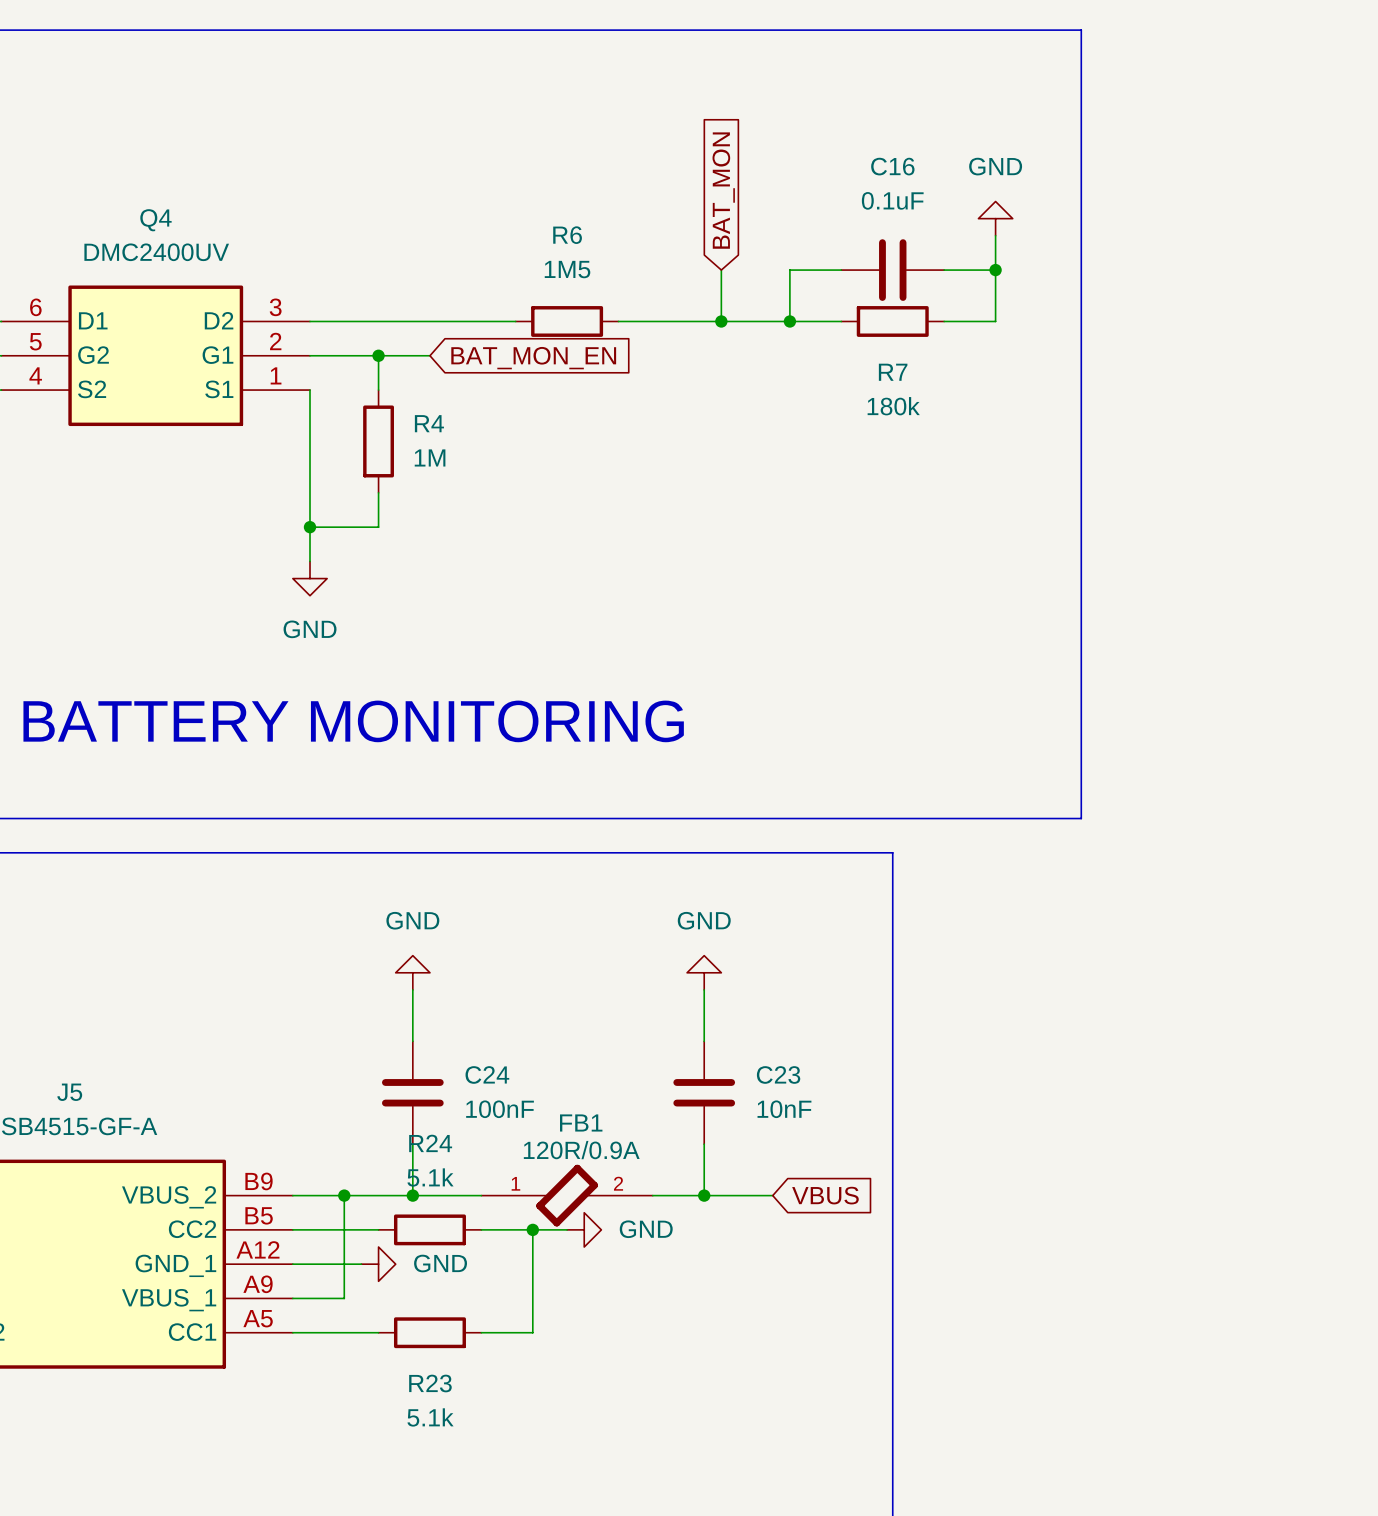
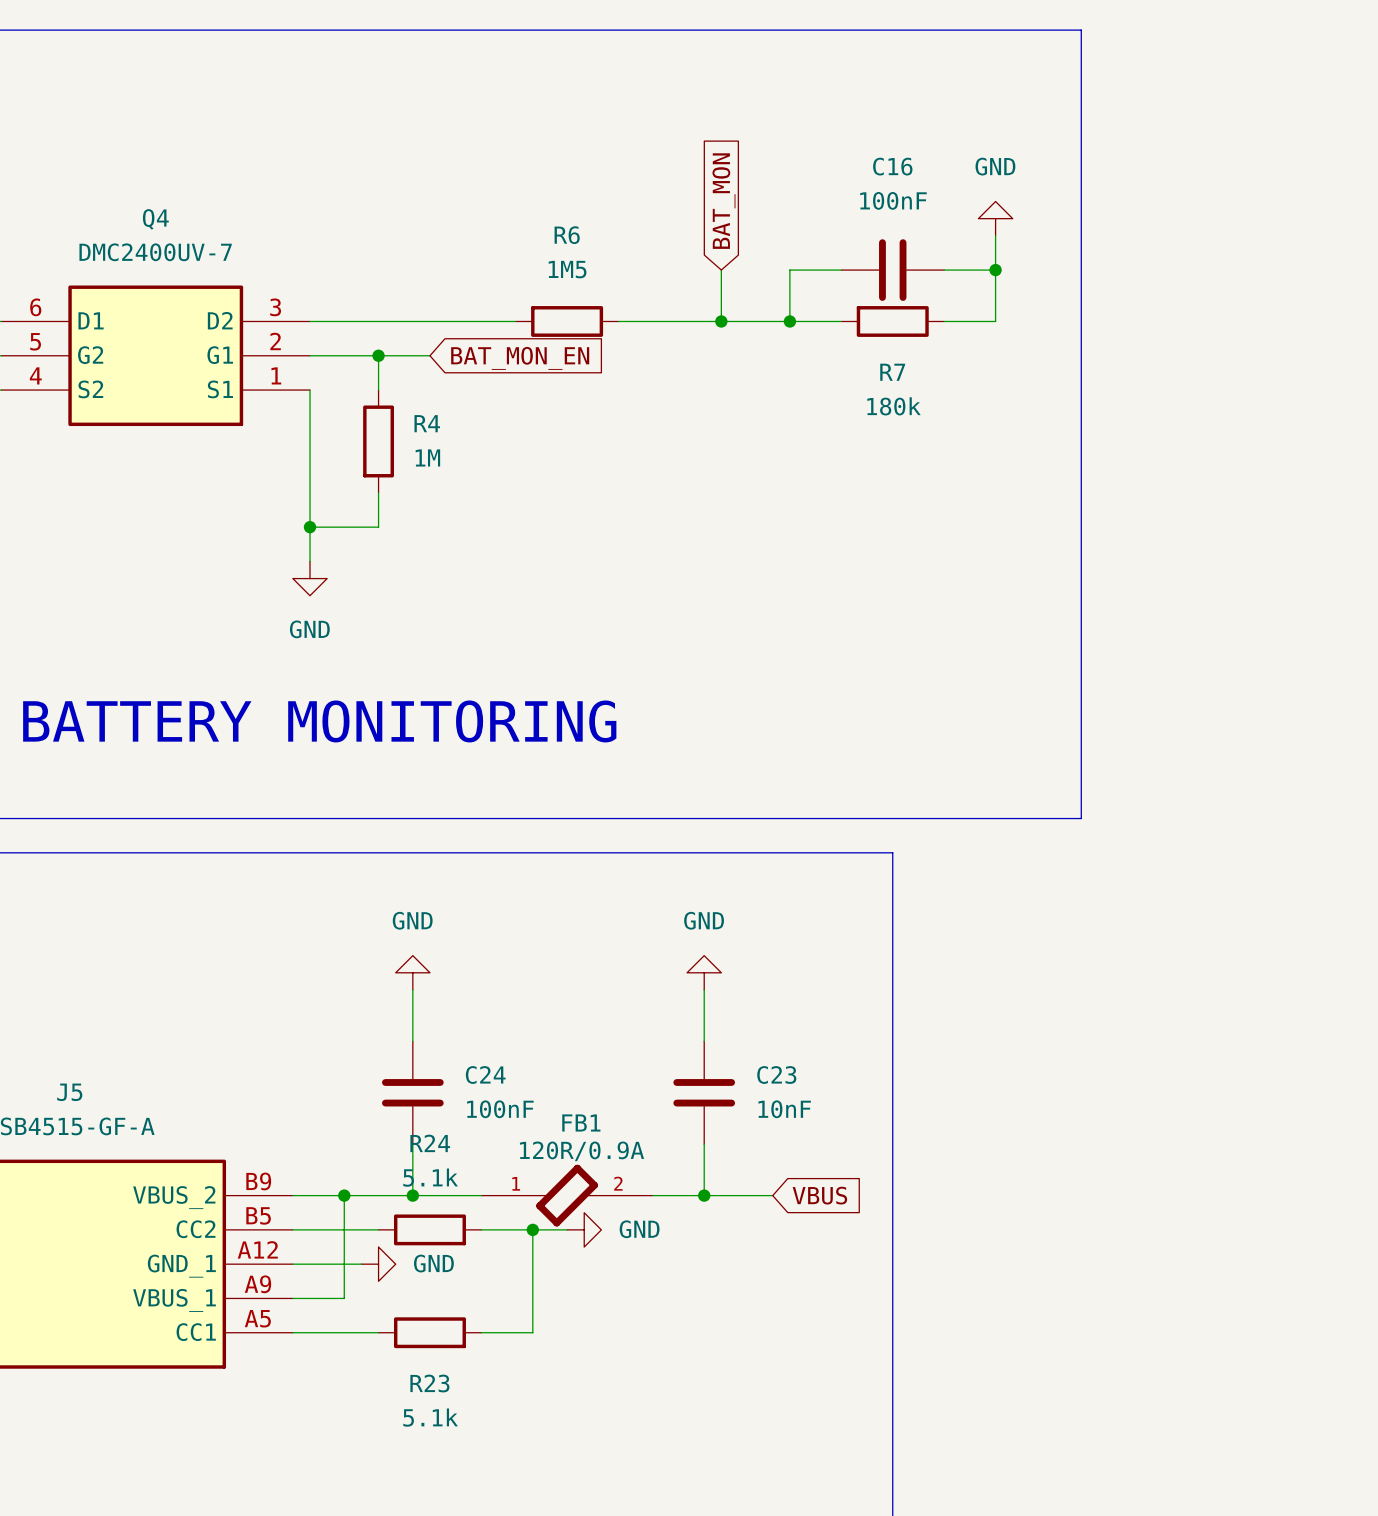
C16 value: 0.1uF (892, 200) -> 100nF (893, 200)
Q4 value: DMC2400UV (156, 252) -> DMC2400UV-7 (155, 252)

